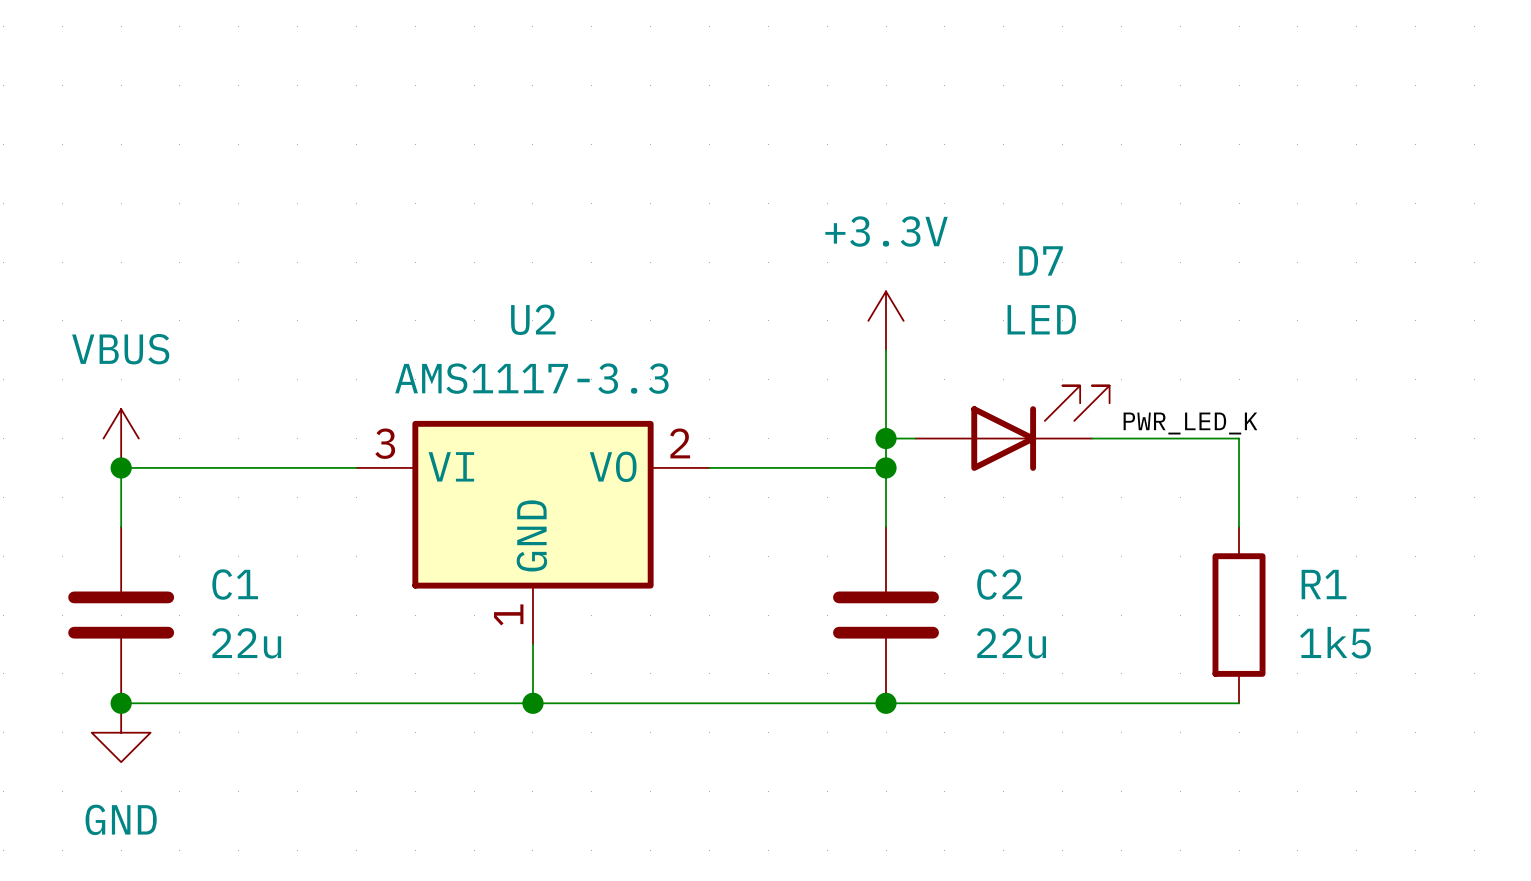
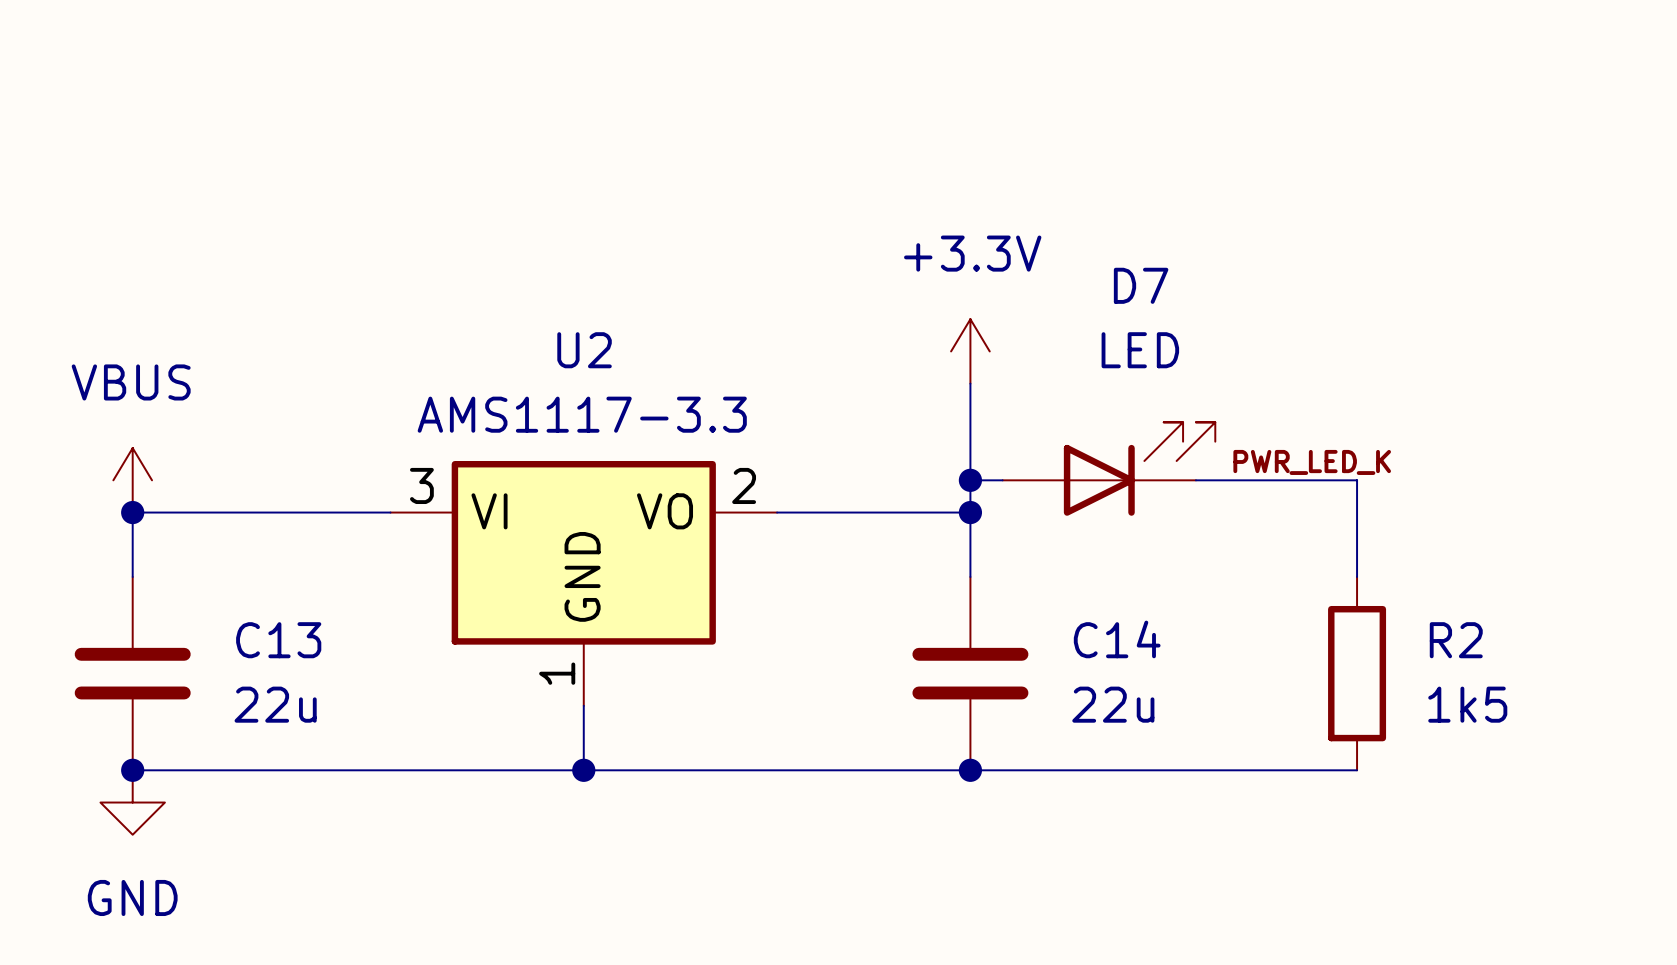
C1 name: C1 (235, 584) -> C13 (278, 640)
C2 name: C2 (999, 584) -> C14 (1117, 639)
R1 name: R1 (1324, 584) -> R2 (1456, 640)

